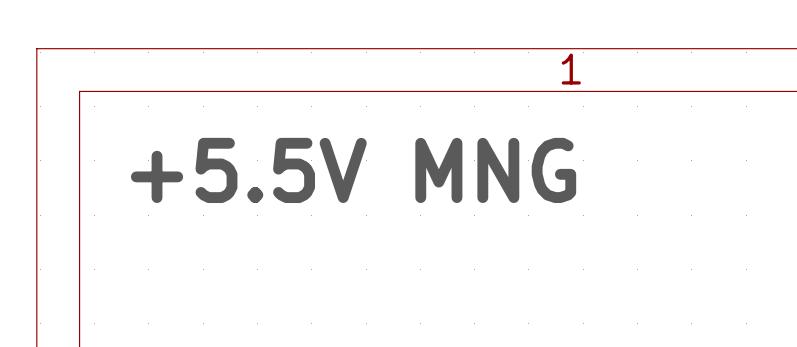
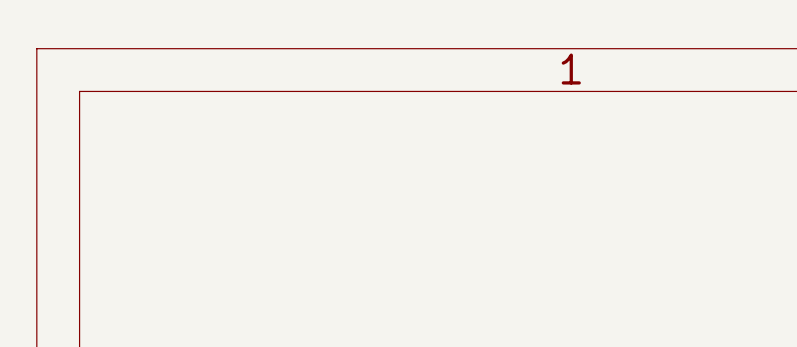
text: +5.5V MNG (353, 170) -> none

